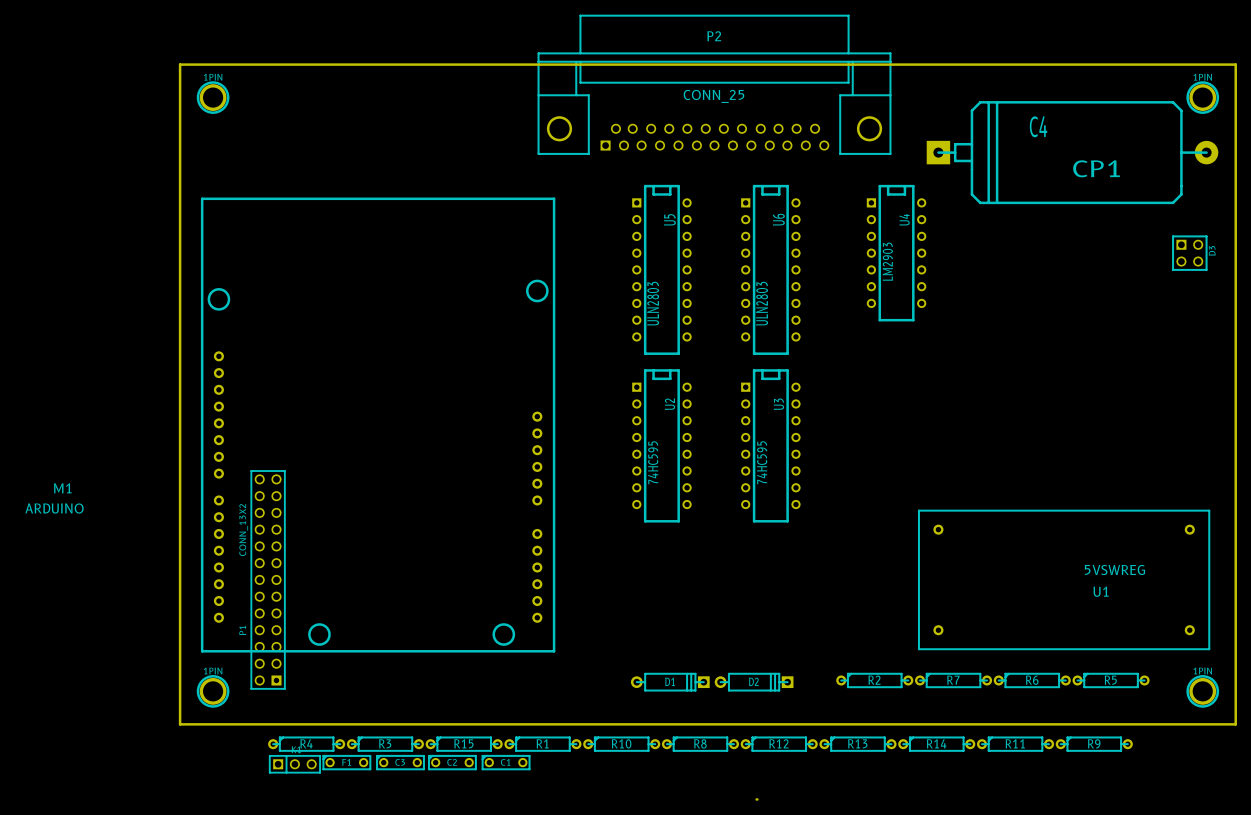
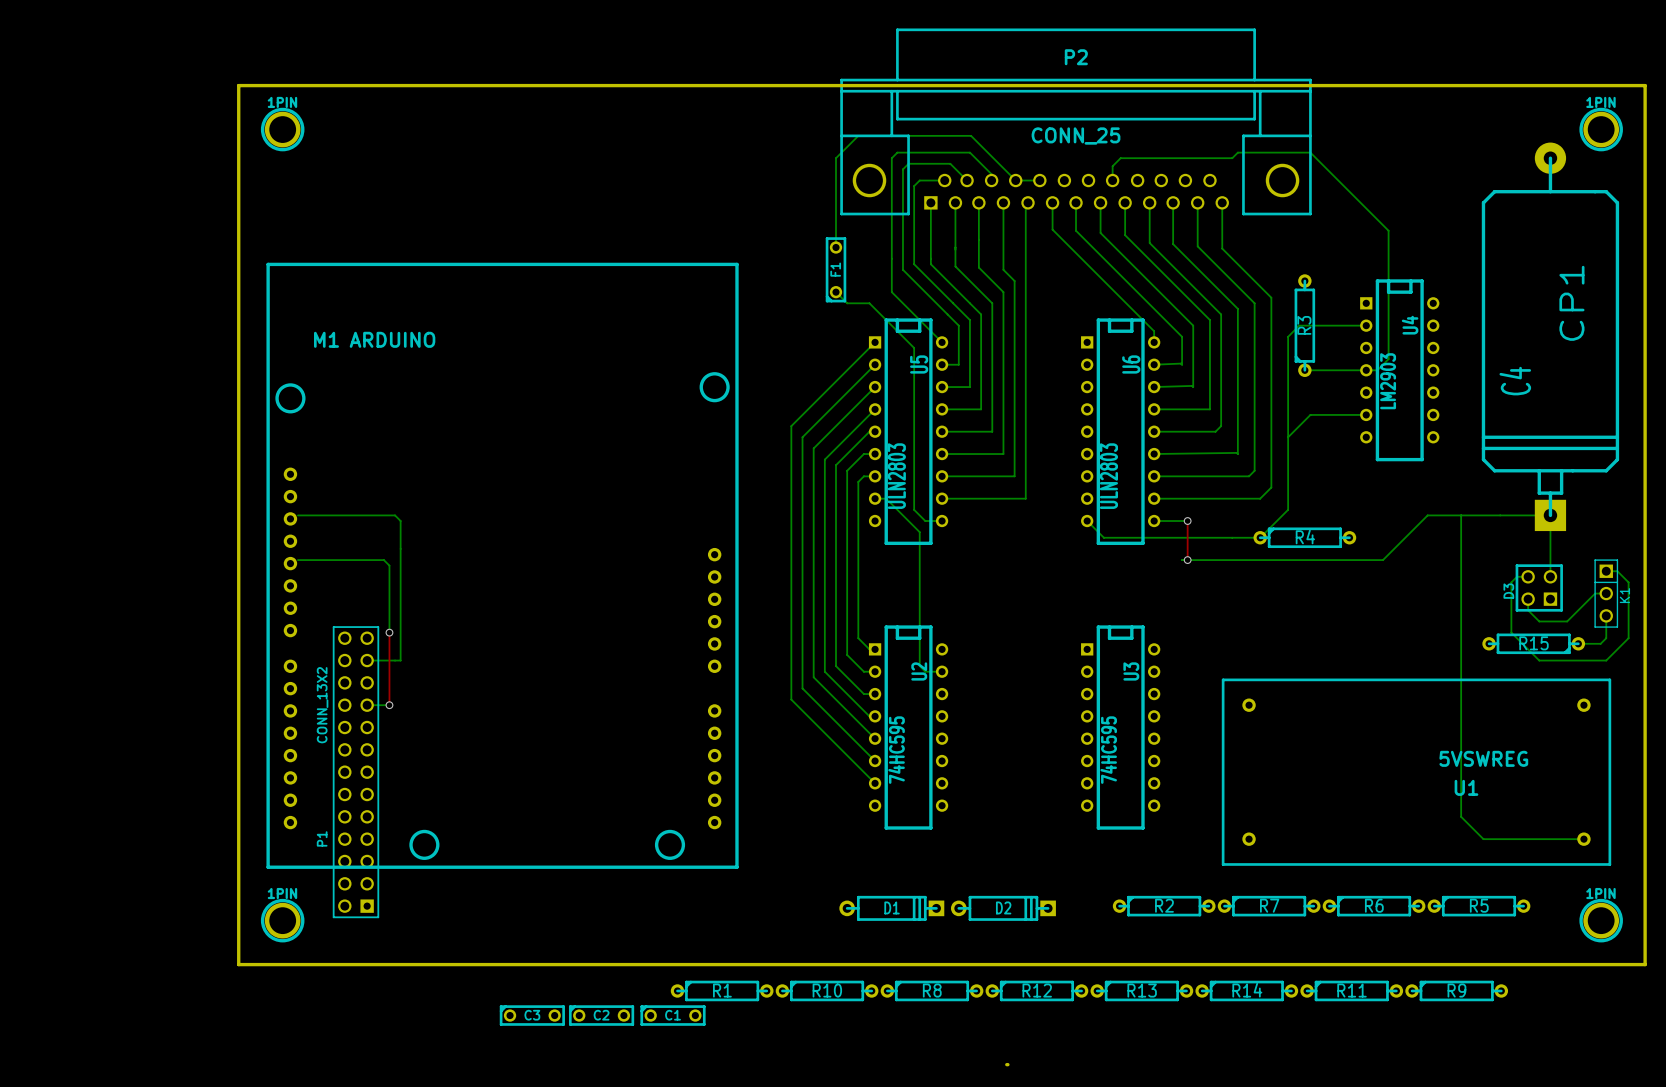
P2 position: (714, 84) -> (1076, 121)
bottom track: none -> (944, 180) (919, 180) (914, 186) (914, 264) (969, 320) (969, 387) (942, 387)
bottom track: none -> (967, 180) (950, 163) (908, 163) (902, 169) (902, 269) (958, 325) (958, 364) (942, 364)
bottom track: none -> (991, 180) (991, 174) (969, 152) (897, 152) (891, 158) (891, 292) (942, 342)
bottom track: none -> (1039, 180) (1015, 180) (971, 135) (858, 135) (836, 158) (836, 247)
bottom track: none -> (1112, 180) (1112, 166) (1120, 158) (1232, 158) (1237, 152) (1310, 152) (1388, 230) (1388, 359) (1377, 370) (1304, 370)
bottom track: none -> (930, 202) (930, 264) (981, 314) (981, 409) (942, 409)
bottom track: none -> (955, 202) (955, 266) (992, 303) (992, 431) (942, 431)
bottom track: none -> (978, 202) (978, 267) (1003, 292) (1003, 454) (942, 454)
bottom track: none -> (1003, 202) (1003, 269) (1014, 280) (1014, 476) (942, 476)
bottom track: none -> (1028, 202) (1025, 205) (1025, 498) (942, 498)
bottom track: none -> (1052, 202) (1052, 229) (1154, 331) (1154, 342)
bottom track: none -> (1076, 202) (1076, 230) (1182, 336) (1182, 364) (1154, 364)
bottom track: none -> (1100, 202) (1100, 232) (1193, 325) (1193, 387) (1154, 387)
bottom track: none -> (1125, 202) (1125, 235) (1209, 320) (1209, 409) (1154, 409)
bottom track: none -> (1149, 202) (1149, 243) (1221, 314) (1221, 426) (1215, 431) (1154, 431)
bottom track: none -> (1173, 202) (1173, 244) (1237, 308) (1237, 454) (1154, 454)
bottom track: none -> (1197, 202) (1197, 246) (1254, 303) (1254, 470) (1249, 476) (1154, 476)
bottom track: none -> (1222, 202) (1222, 248) (1271, 297) (1271, 487) (1260, 498) (1154, 498)
C4 rotation: 0° (1072, 152) -> 90° counterclockwise (1550, 336)
bottom track: none -> (836, 292) (847, 303) (869, 303) (914, 347) (914, 509) (925, 521) (942, 521)
bottom track: none -> (1366, 325) (1299, 325) (1288, 336) (1288, 509) (1260, 537) (1103, 537) (1087, 521)
U4 position: (896, 253) -> (1399, 370)
D3 rotation: 0° (1189, 253) -> 180° (1539, 587)
D3 position: (1189, 253) -> (1539, 587)
bottom track: none -> (875, 342) (791, 426) (791, 699) (875, 783)
U5 position: (661, 269) -> (908, 431)
U6 position: (770, 269) -> (1120, 431)
bottom track: none -> (875, 364) (802, 437) (802, 688) (875, 761) (875, 755)
bottom track: none -> (875, 387) (813, 448) (813, 677) (875, 738)
bottom track: none -> (875, 414) (875, 409) (824, 459) (824, 671) (869, 716) (875, 716)
bottom track: none -> (1366, 414) (1310, 414) (1288, 437)
bottom track: none -> (875, 431) (869, 431) (836, 465) (836, 666) (863, 694) (875, 694)
bottom track: none -> (875, 454) (863, 454) (847, 470) (847, 654) (863, 671) (875, 671)
bottom track: none -> (875, 476) (863, 476) (858, 481) (858, 638) (869, 649) (875, 649)
bottom track: none -> (875, 498) (886, 498) (919, 532) (919, 666) (925, 671) (942, 671)
bottom track: none -> (297, 515) (395, 515) (400, 521) (400, 660) (367, 660)
bottom track: none -> (1461, 515) (1461, 816) (1483, 839) (1583, 839)
bottom track: none -> (1154, 521) (1187, 521)
top track: none -> (1187, 521) (1187, 560)
via: none -> (1187, 521)
bottom track: none -> (297, 560) (383, 560) (389, 565) (389, 632)
bottom track: none -> (1182, 560) (1383, 560) (1427, 515) (1550, 515) (1550, 576)
via: none -> (1187, 560)
bottom track: none -> (1606, 571) (1617, 571) (1628, 582) (1628, 638) (1606, 660) (1539, 660) (1511, 632) (1511, 582) (1516, 576) (1528, 576)
U2 position: (661, 445) -> (908, 727)
U3 position: (770, 445) -> (1120, 727)
bottom track: none -> (1606, 593) (1595, 593) (1567, 621) (1539, 621) (1528, 610) (1528, 599)
bottom track: none -> (1606, 615) (1606, 638) (1600, 643) (1578, 643)
top track: none -> (389, 632) (389, 705)
via: none -> (389, 632)
M1 name position: M1 (62, 488) -> M1 (326, 339)
M1 value position: ARDUINO (54, 508) -> ARDUINO (392, 339)
bottom track: none -> (367, 705) (389, 705)
via: none -> (389, 705)
R4 position: (306, 744) -> (1304, 537)
R3 rotation: 0° (385, 744) -> 90° counterclockwise (1304, 325)
R3 position: (385, 744) -> (1304, 325)
R15 rotation: 0° (464, 744) -> 180° (1533, 643)
R15 position: (464, 744) -> (1533, 643)
F1 rotation: 0° (346, 762) -> 90° counterclockwise (836, 269)
F1 position: (346, 762) -> (836, 269)
K1 rotation: 0° (294, 764) -> 90° clockwise (1606, 593)
K1 position: (294, 764) -> (1606, 593)

